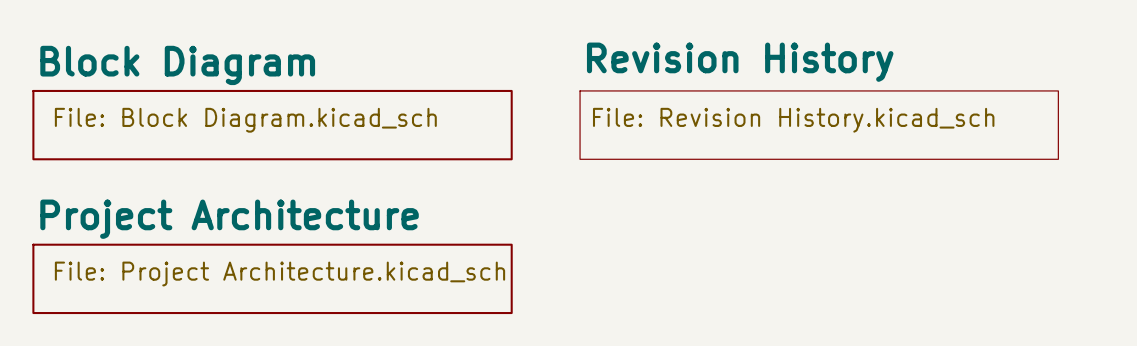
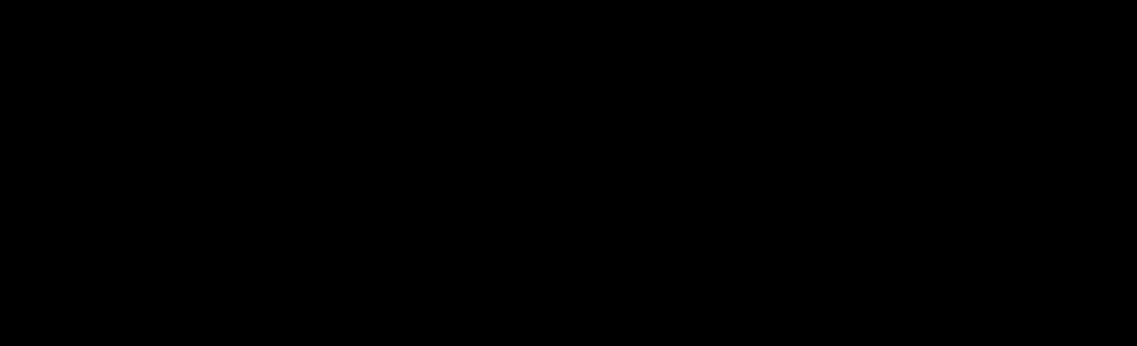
sheet Block Diagram: File: Block Diagram.kicad_sch (272, 125) -> none
sheet Revision History: File: Revision History.kicad_sch (819, 125) -> none
sheet Project Architecture: File: Project Architecture.kicad_sch (272, 278) -> none

